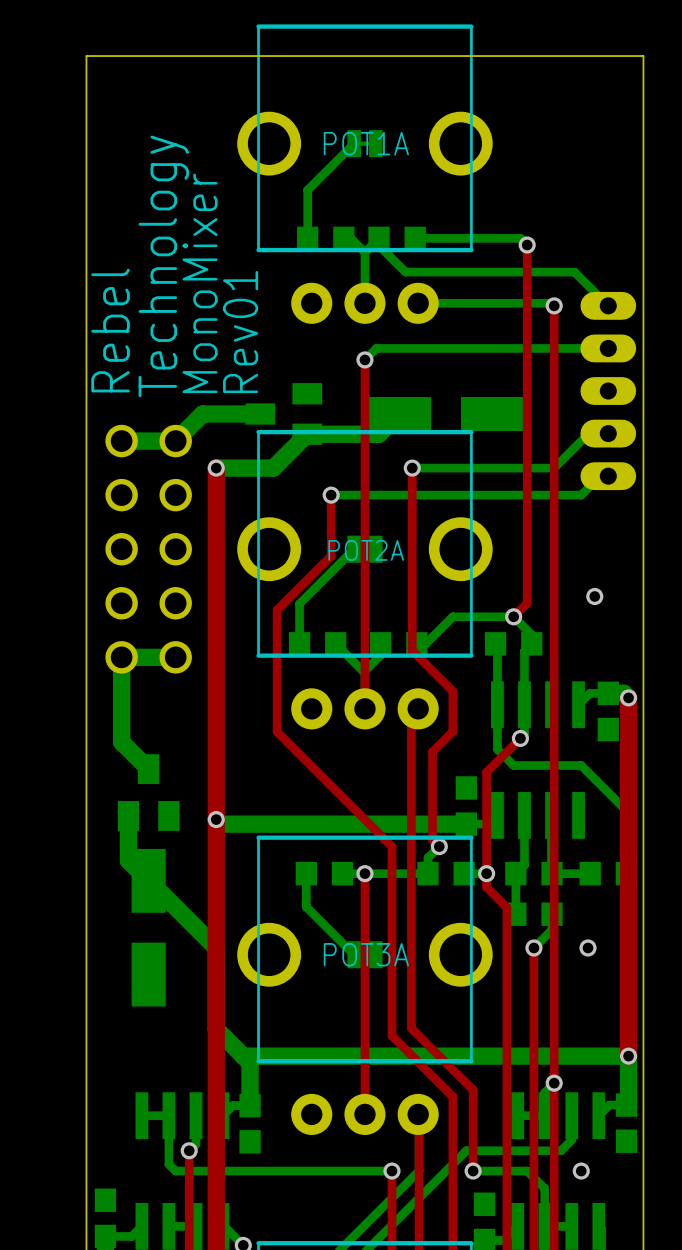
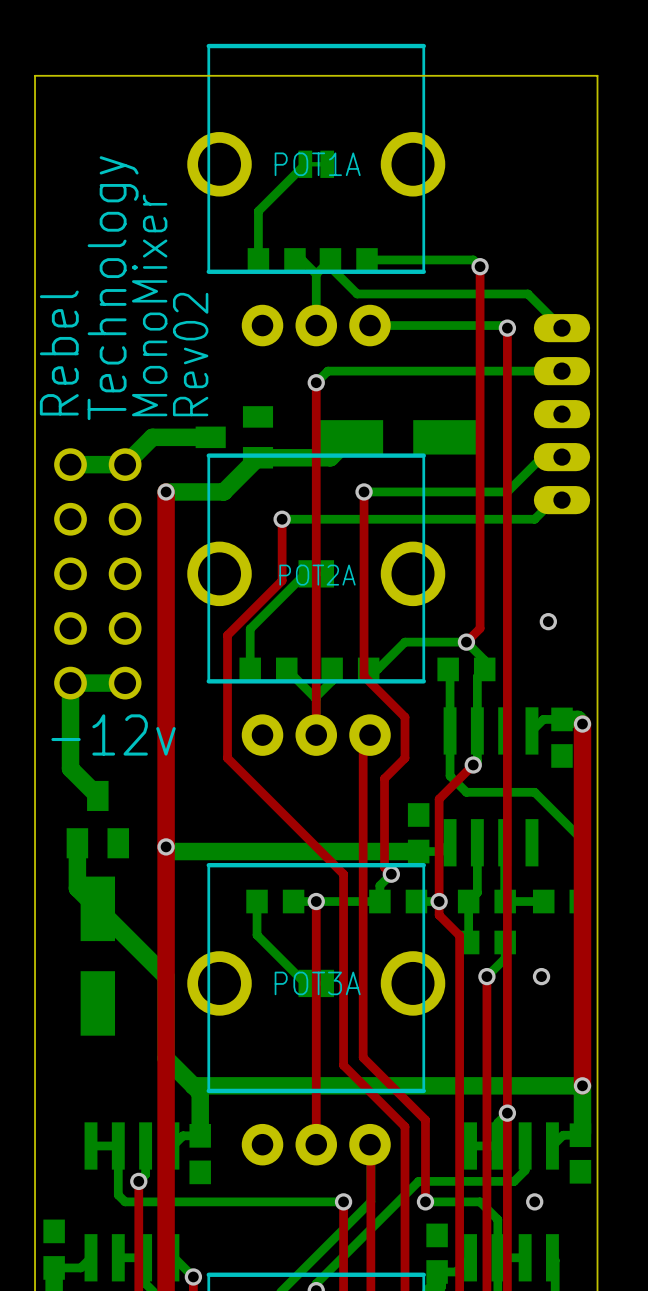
text: Rev01 (240, 332) -> Rev02 (190, 354)
text: none -> -12v (113, 734)

